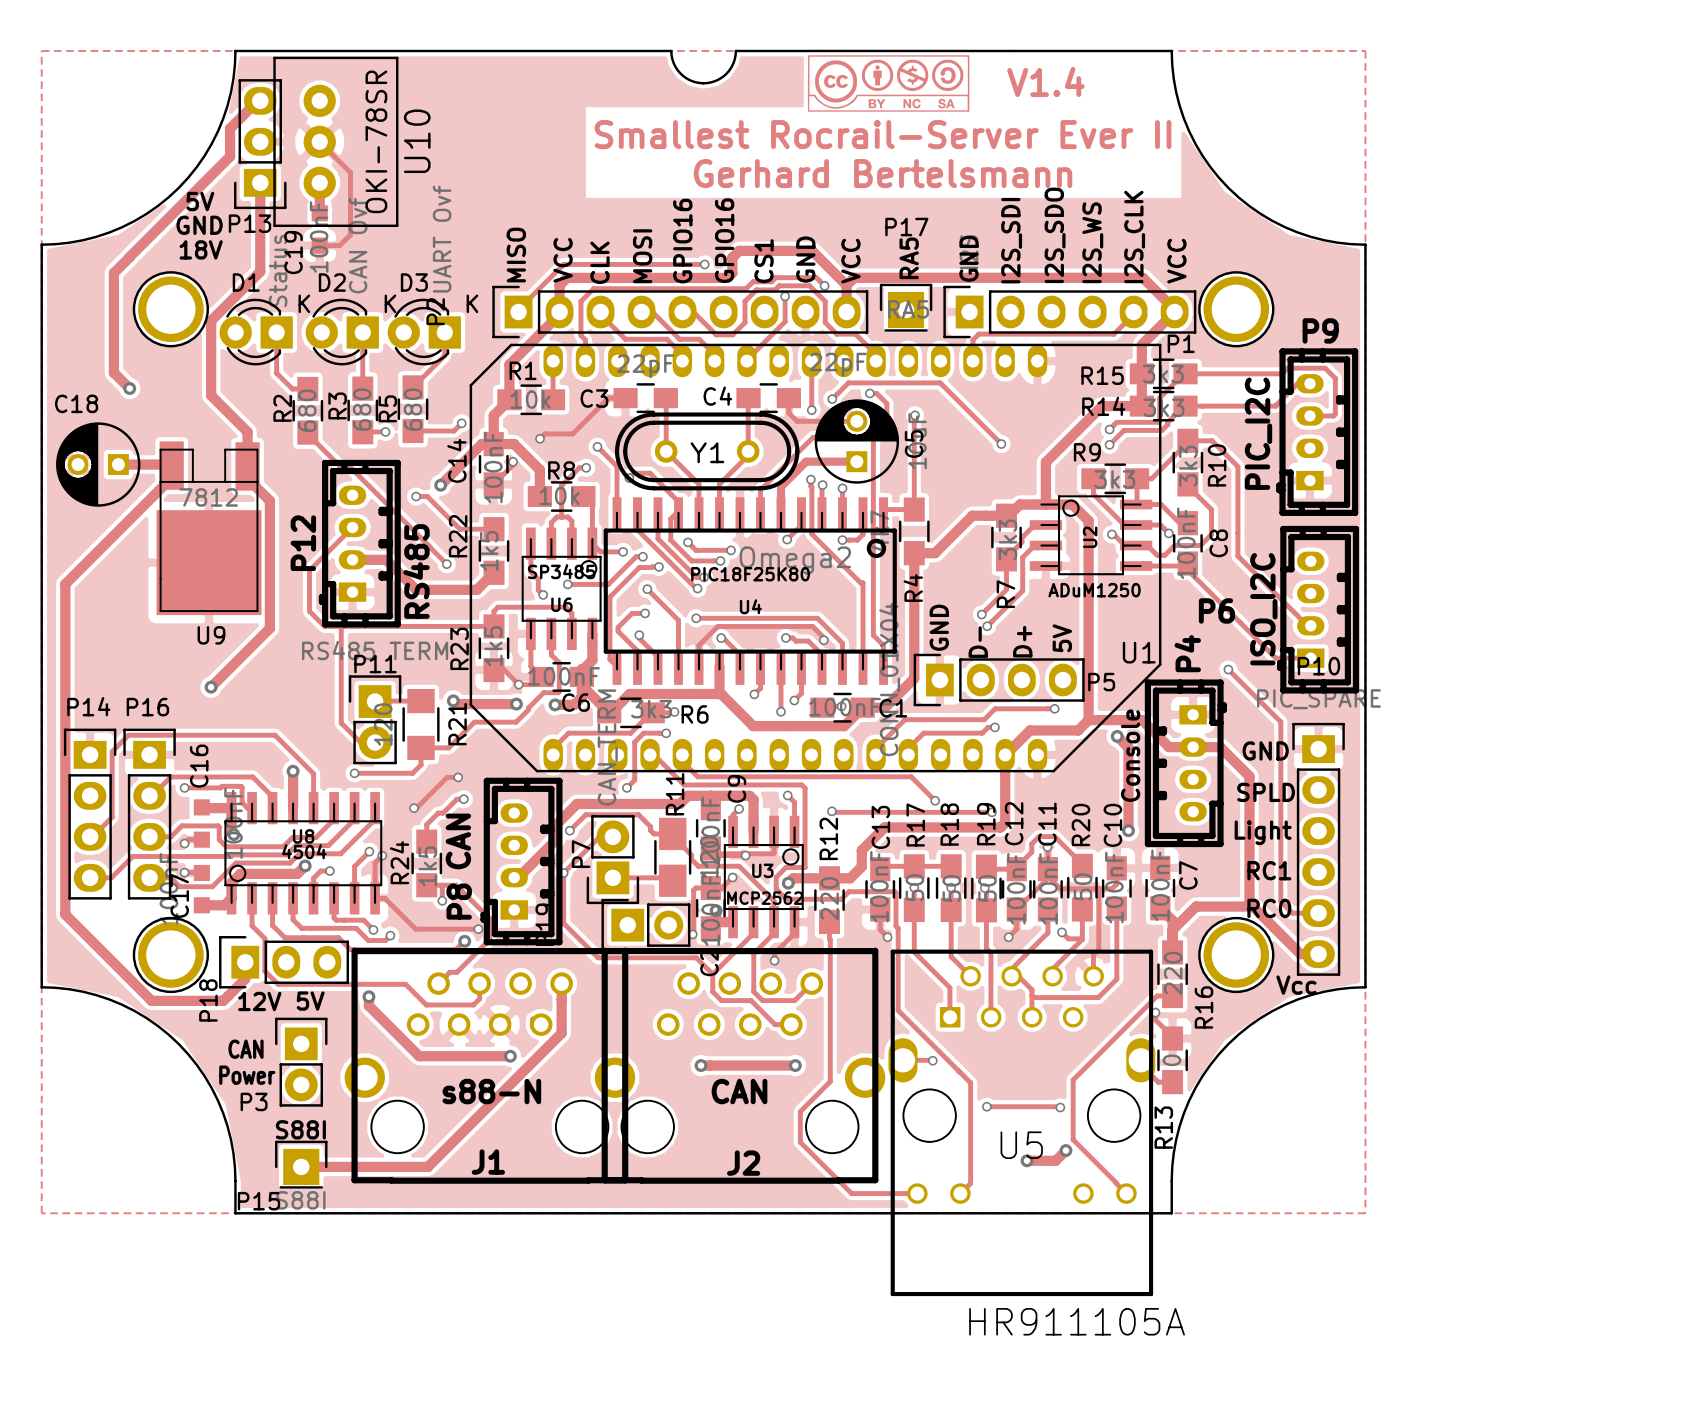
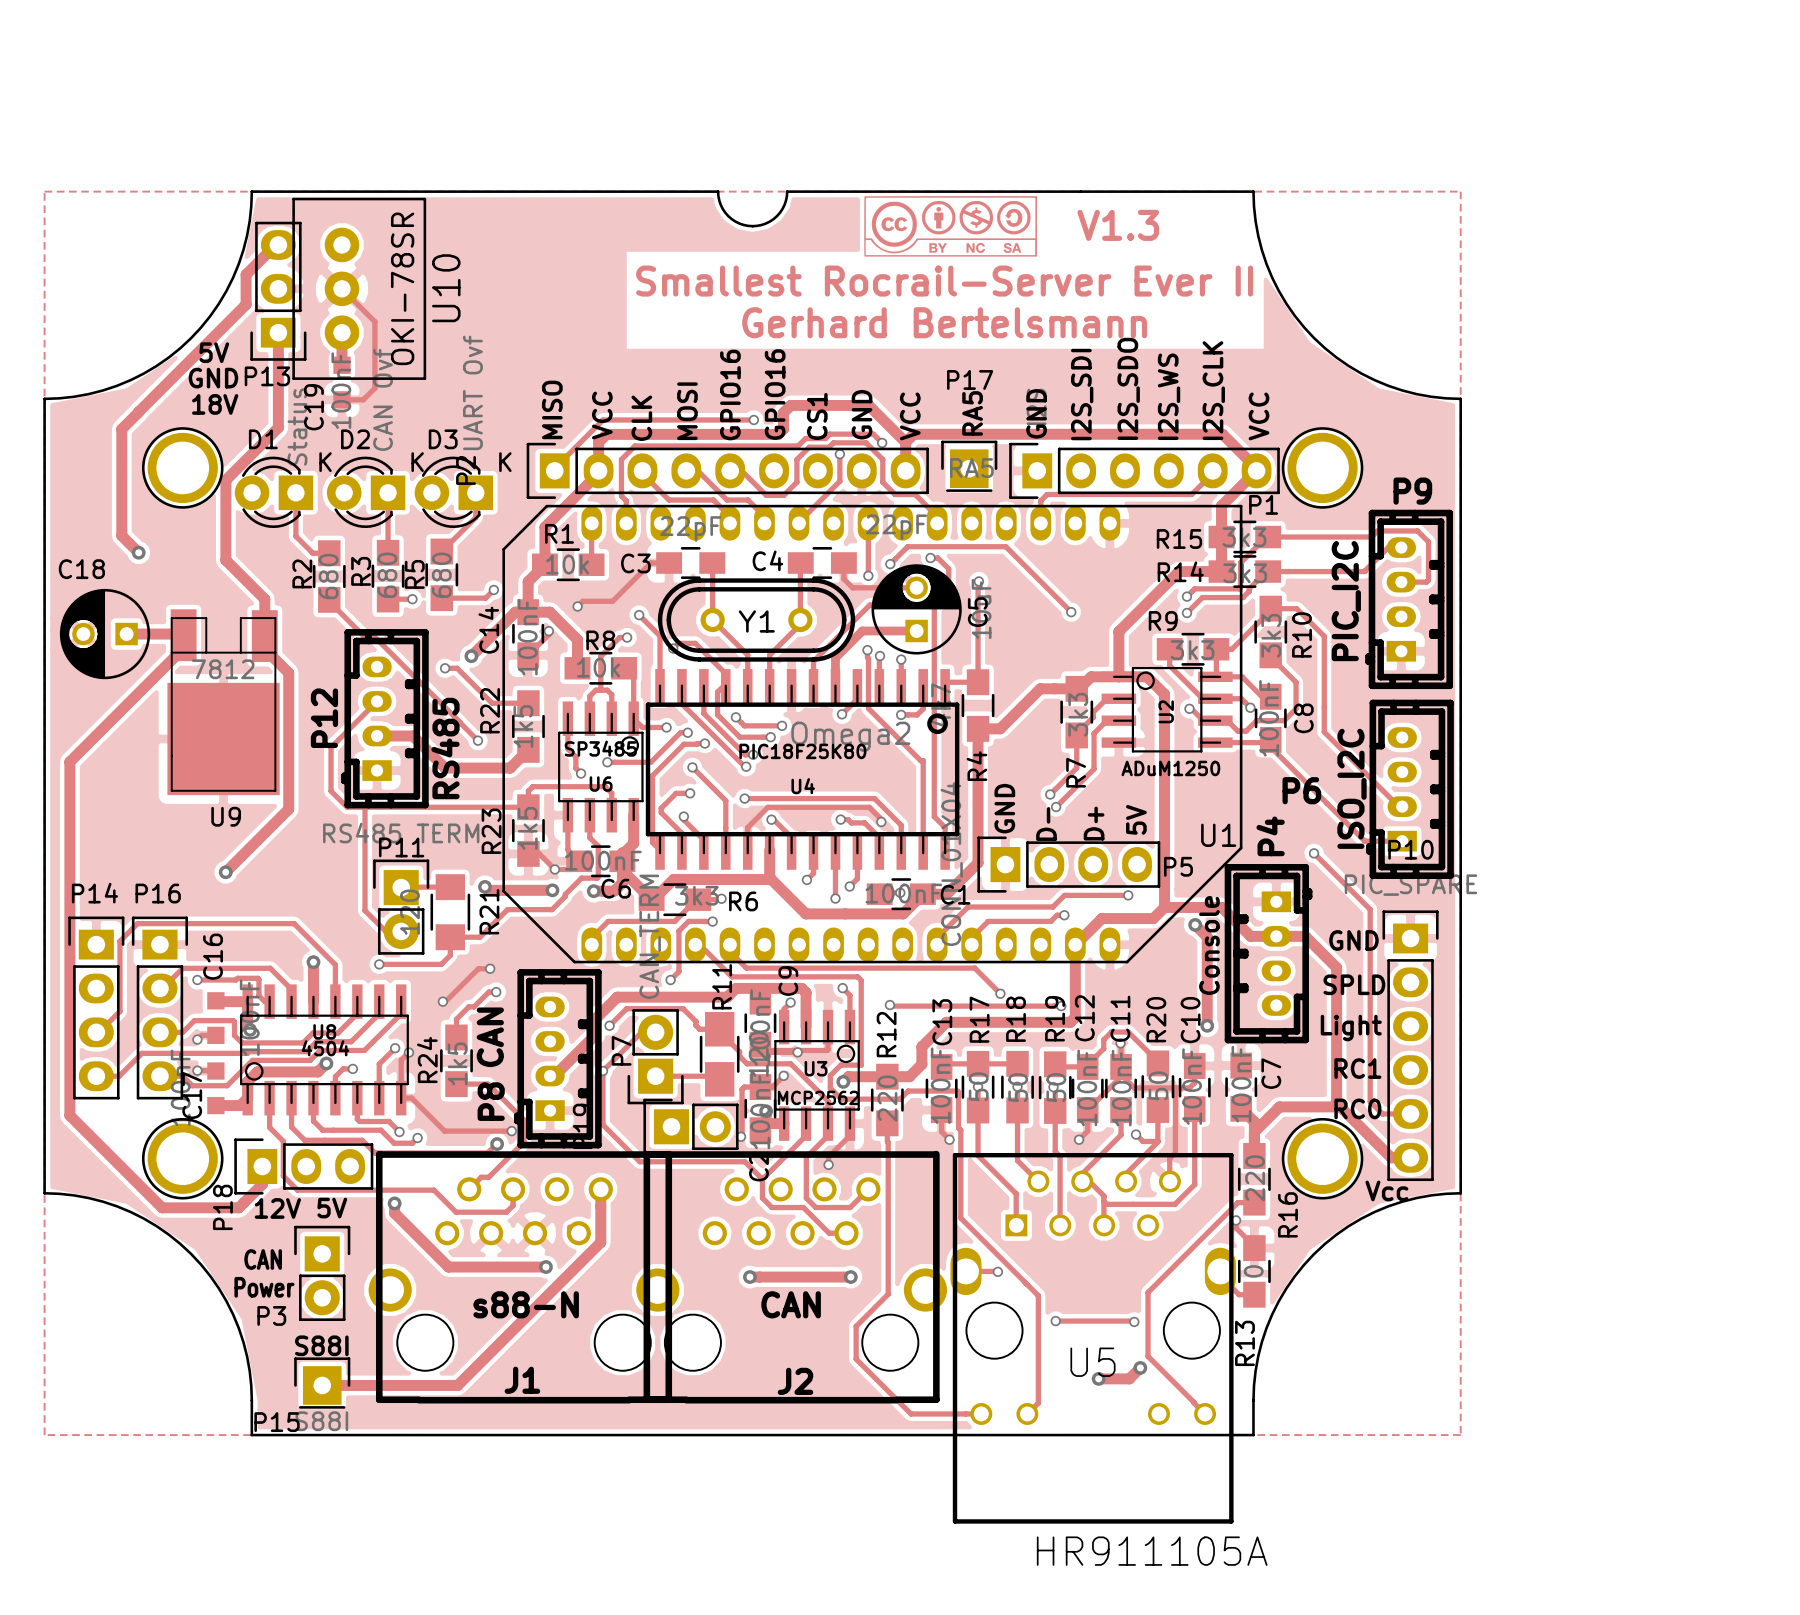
text: V1.4 (1045, 81) -> V1.3 (1118, 225)
track: (442, 885) (442, 900) -> none
via: (442, 900) -> none

